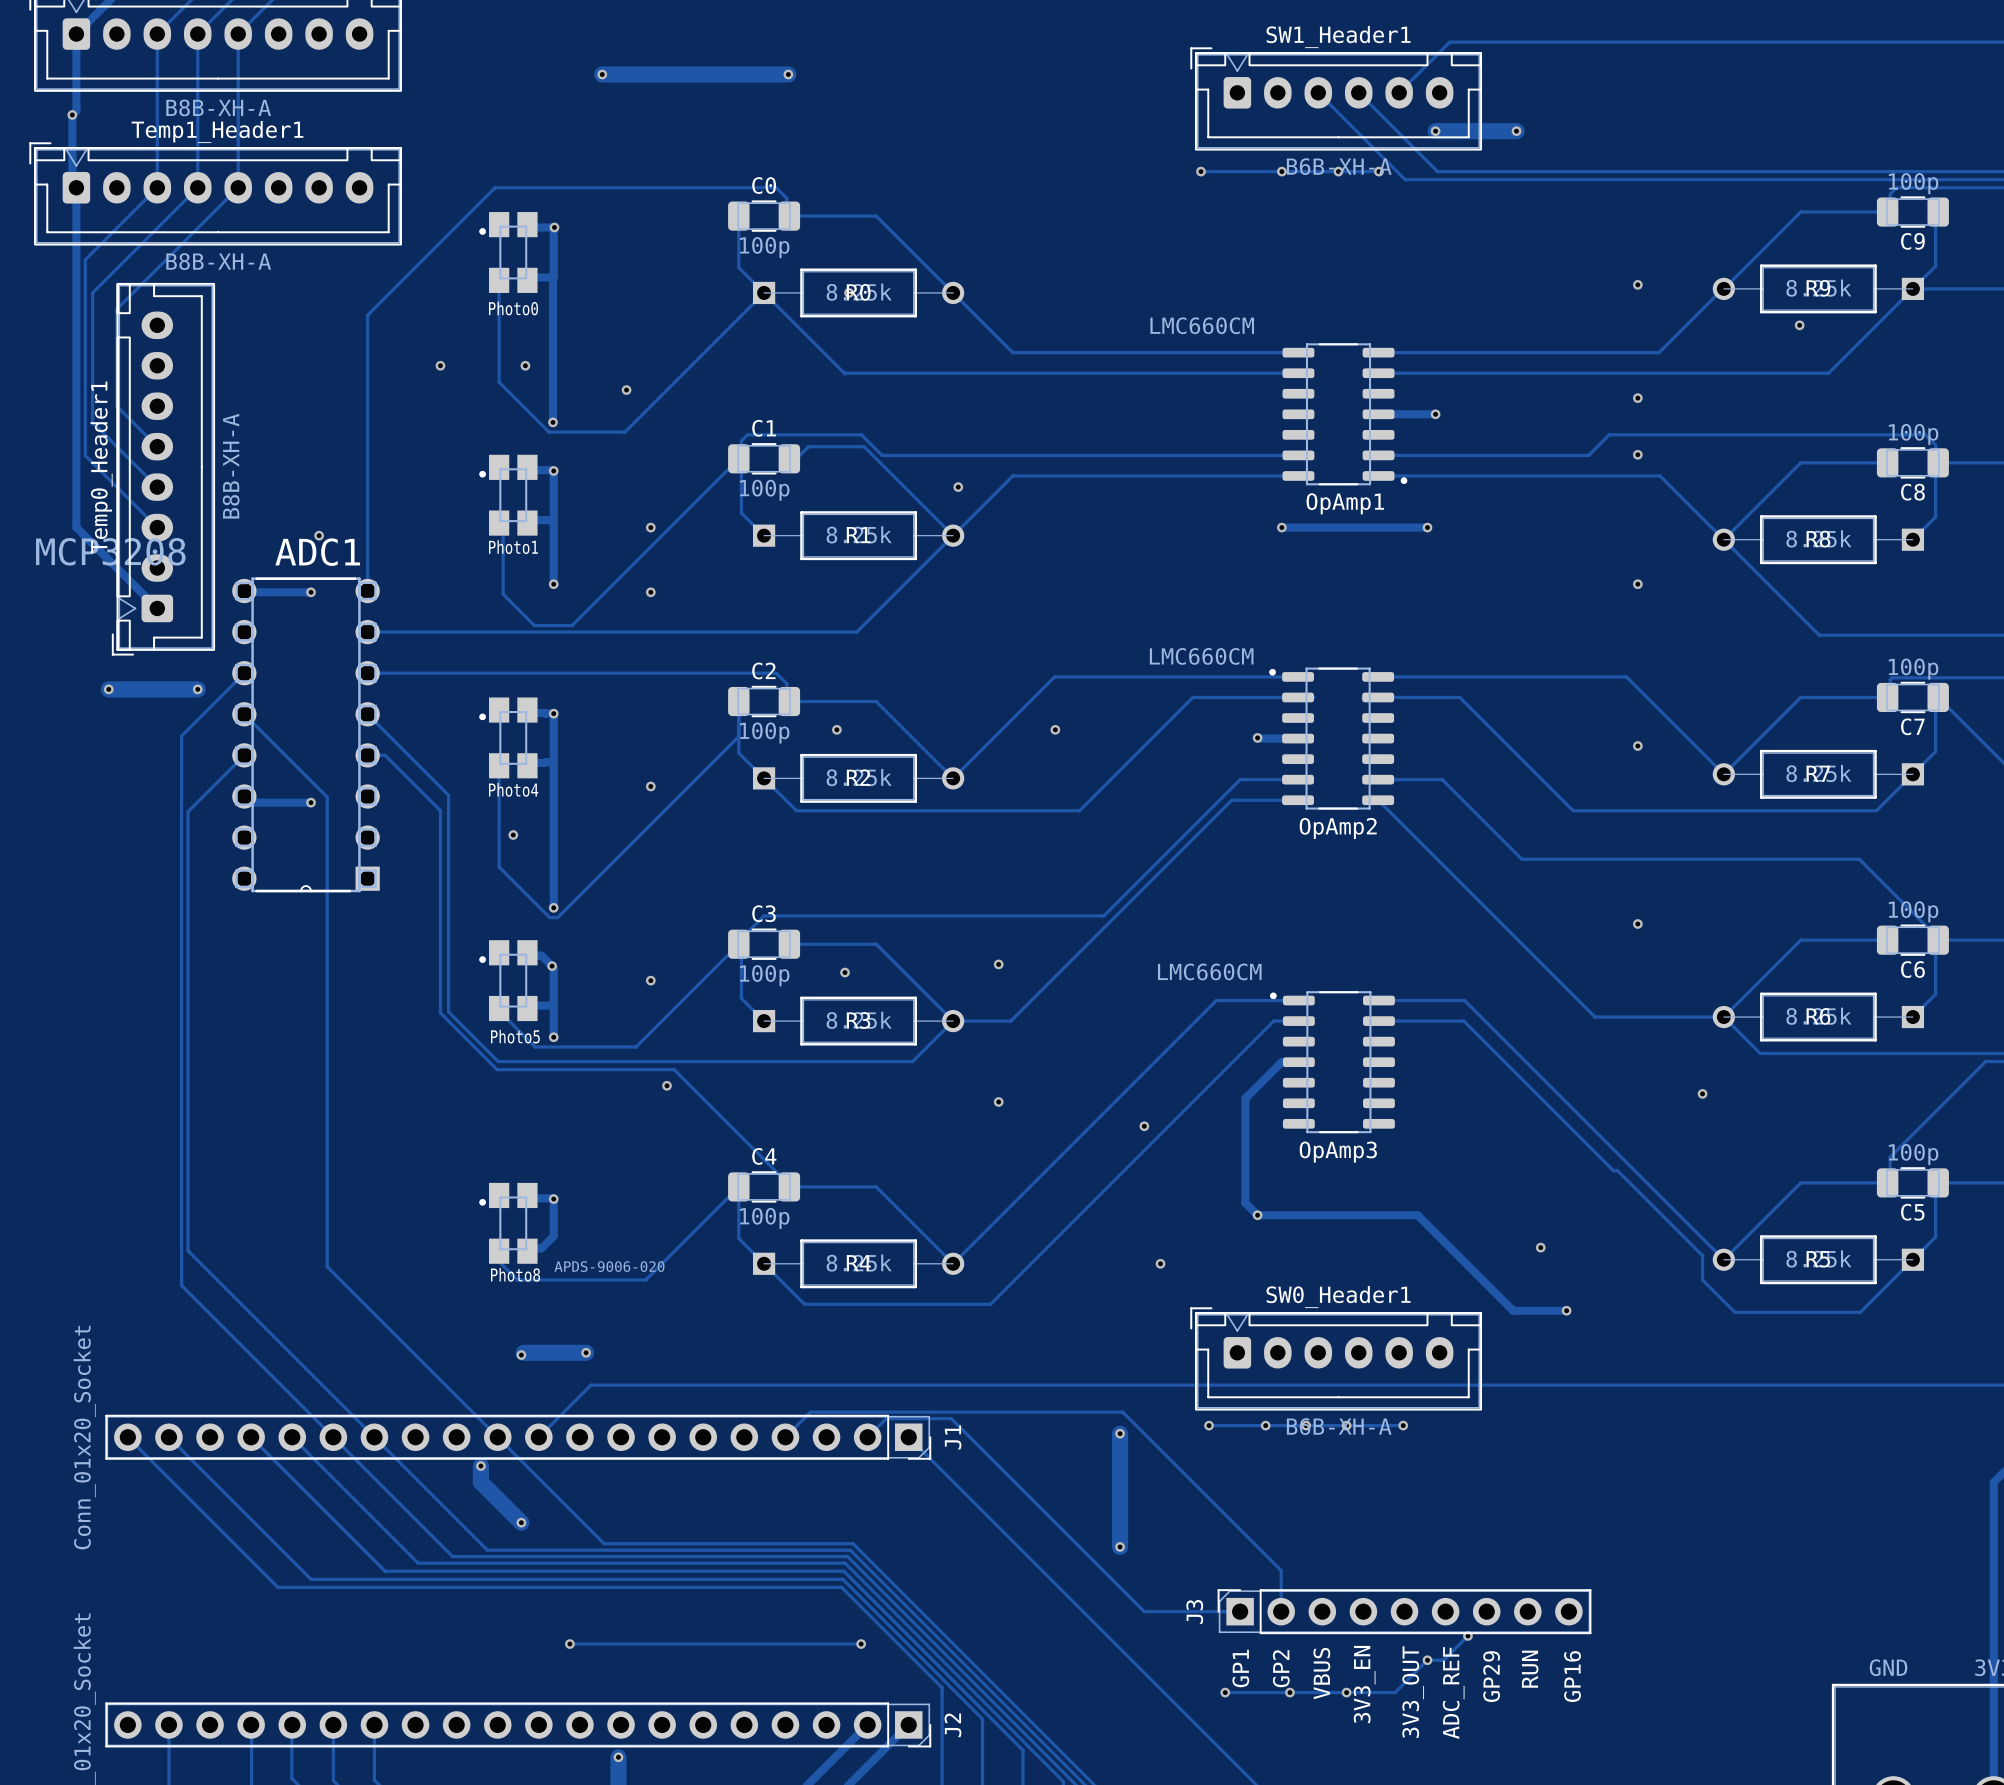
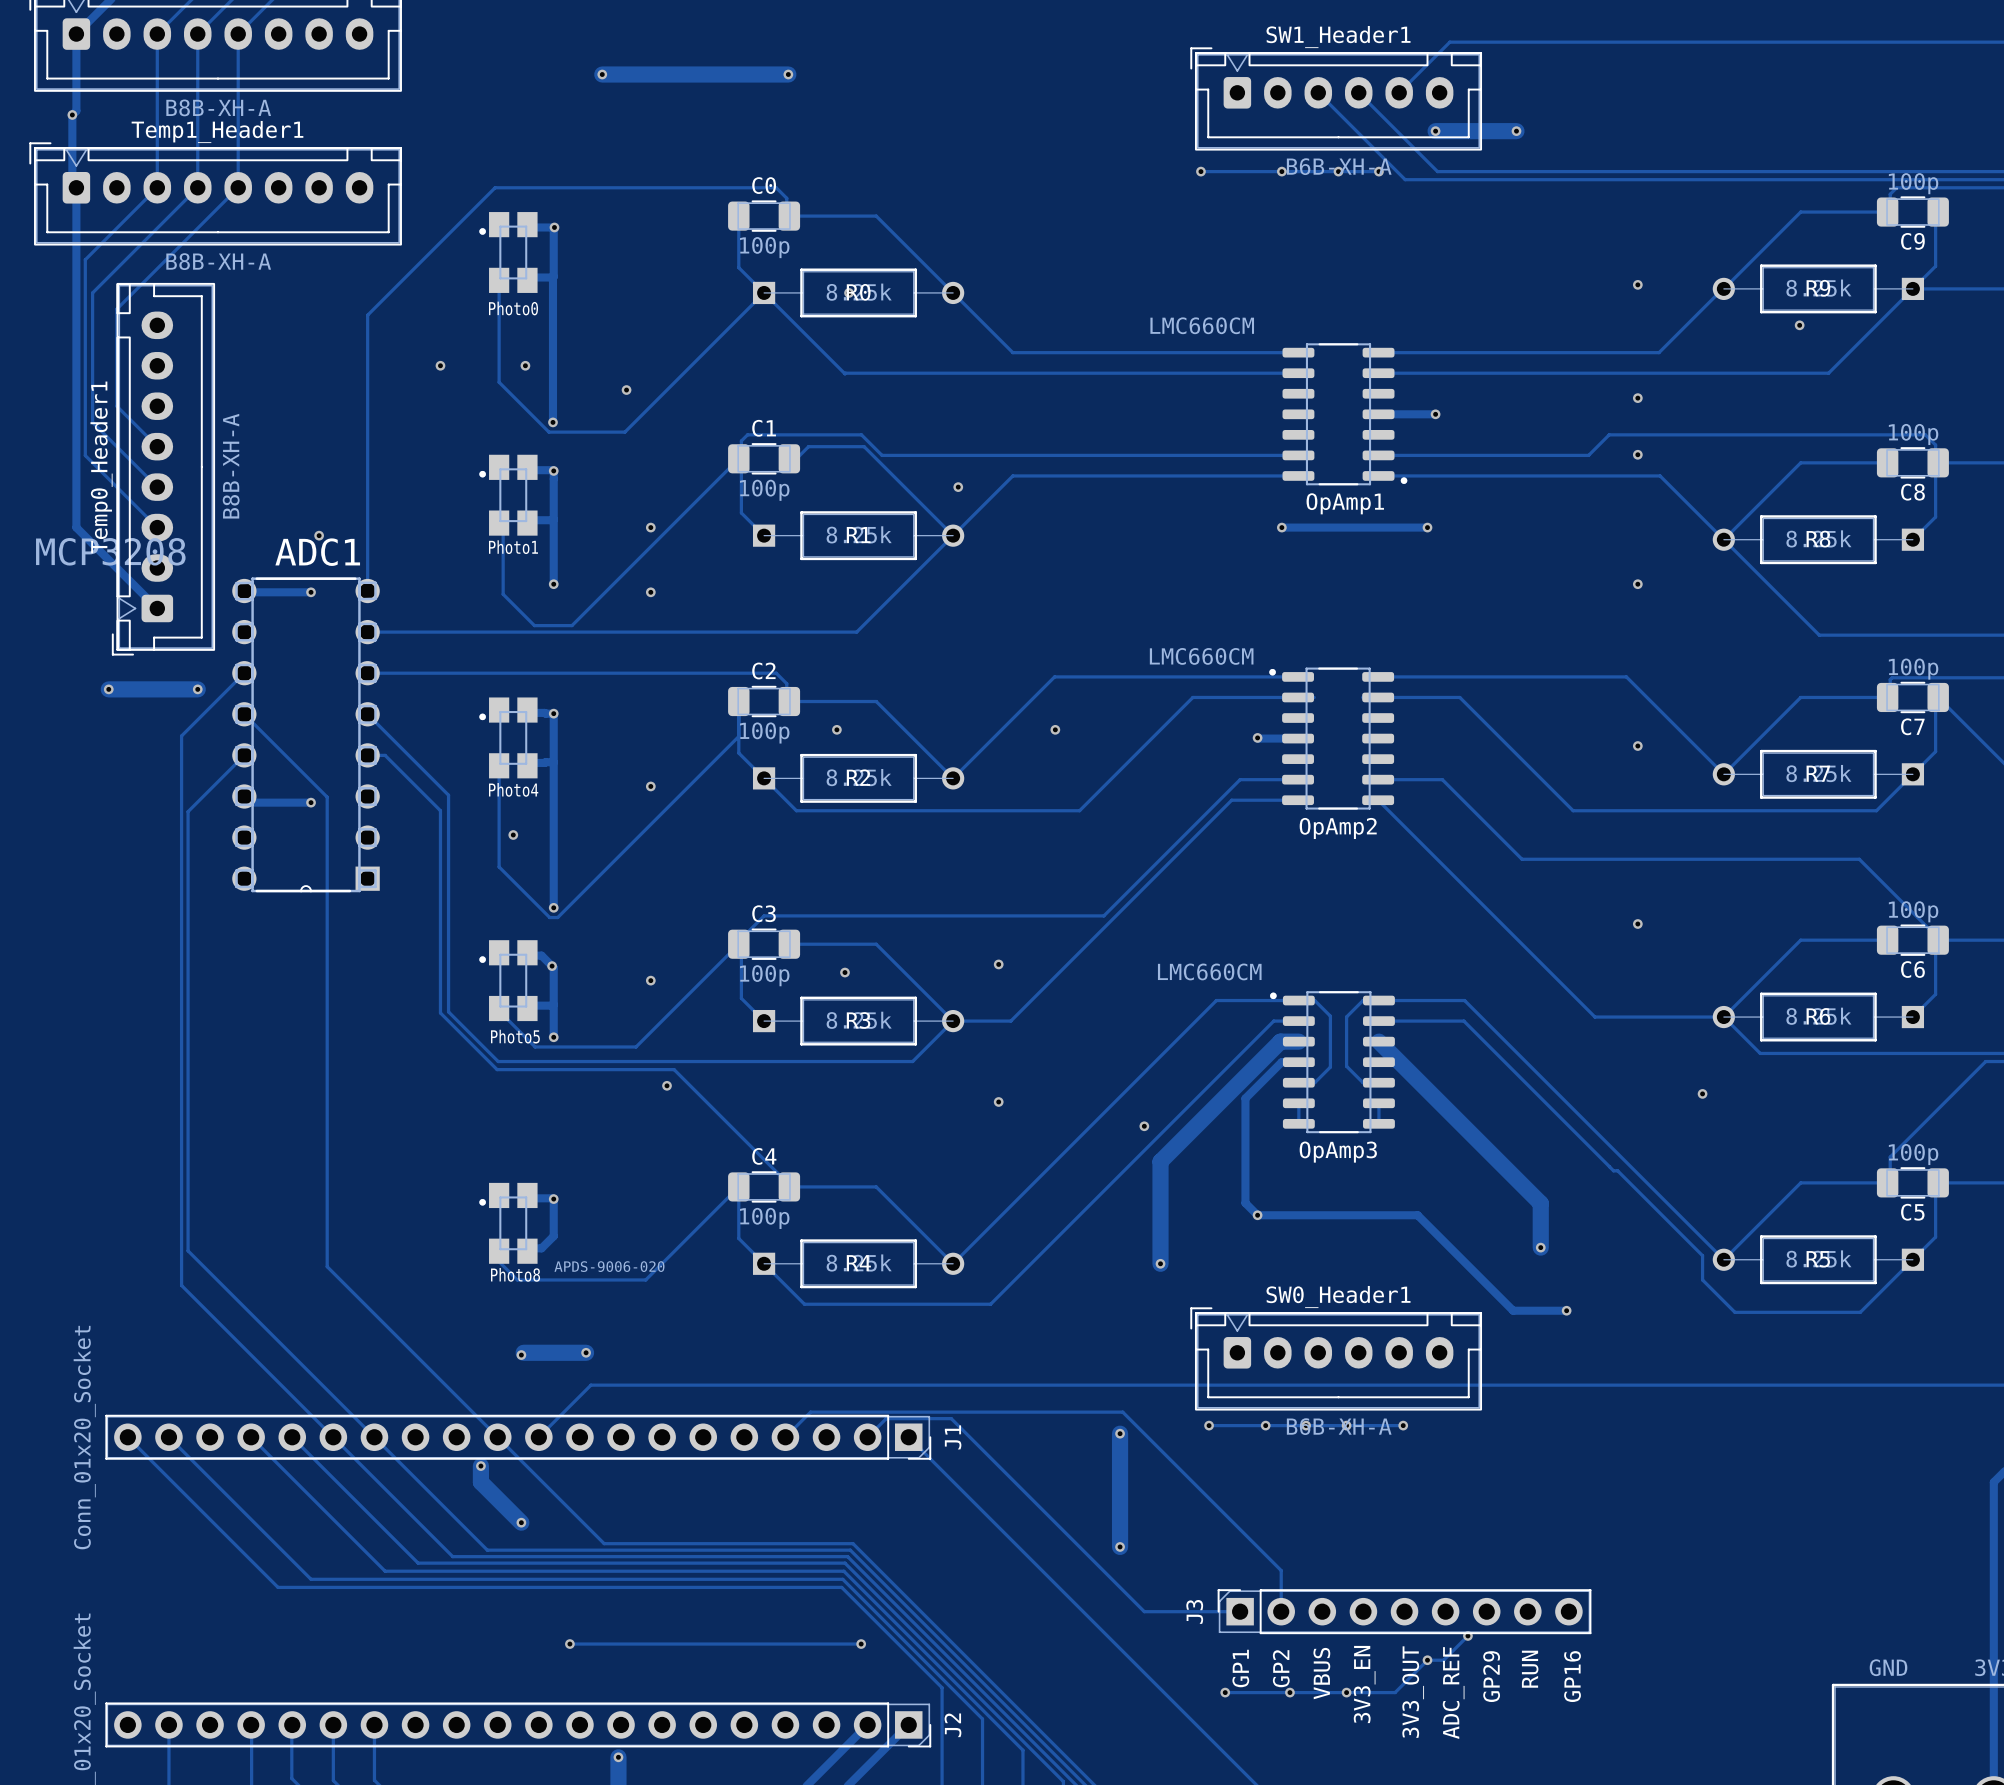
track: none -> (1298, 1000) (1314, 1000) (1330, 1016) (1330, 1067) (1314, 1082) (1298, 1082)
track: none -> (1378, 1000) (1363, 1000) (1346, 1016) (1346, 1066) (1363, 1082) (1378, 1082)
track: none -> (1298, 1041) (1280, 1041) (1160, 1161) (1160, 1263)
track: none -> (1378, 1041) (1540, 1203) (1540, 1247)
track: none -> (1299, 1103) (1298, 1123)
track: none -> (1378, 1103) (1378, 1123)

